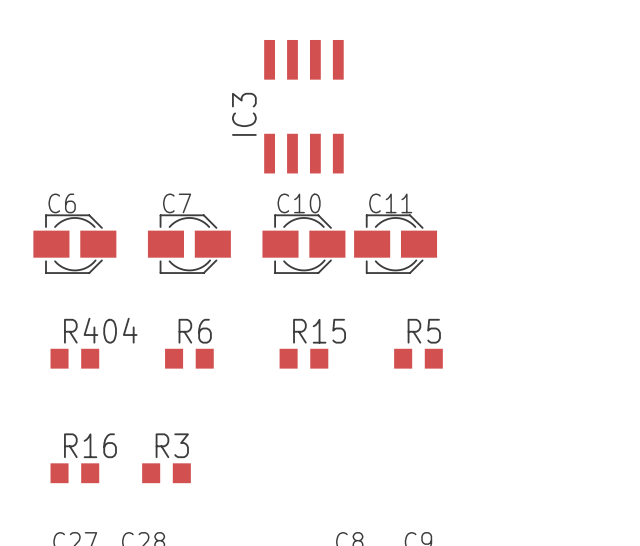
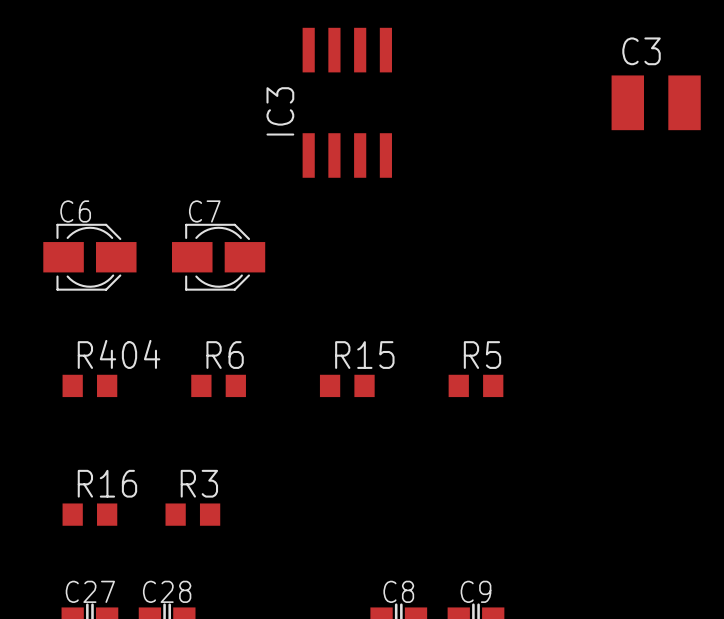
C3: none -> (656, 102)
C10: (303, 244) -> none
C11: (395, 244) -> none

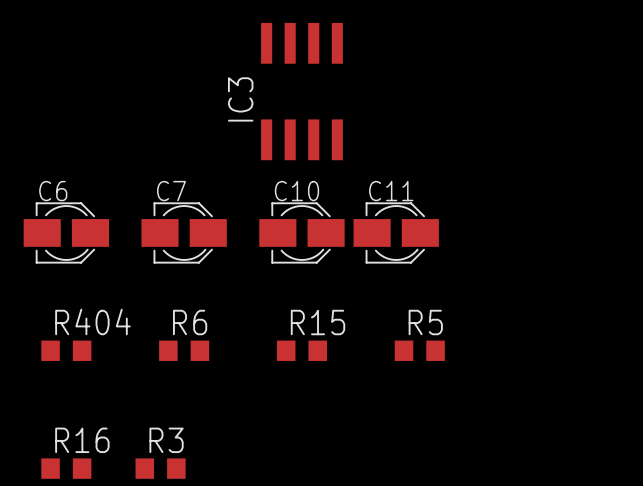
C3: (656, 102) -> none
C10: none -> (301, 232)
C11: none -> (396, 232)

